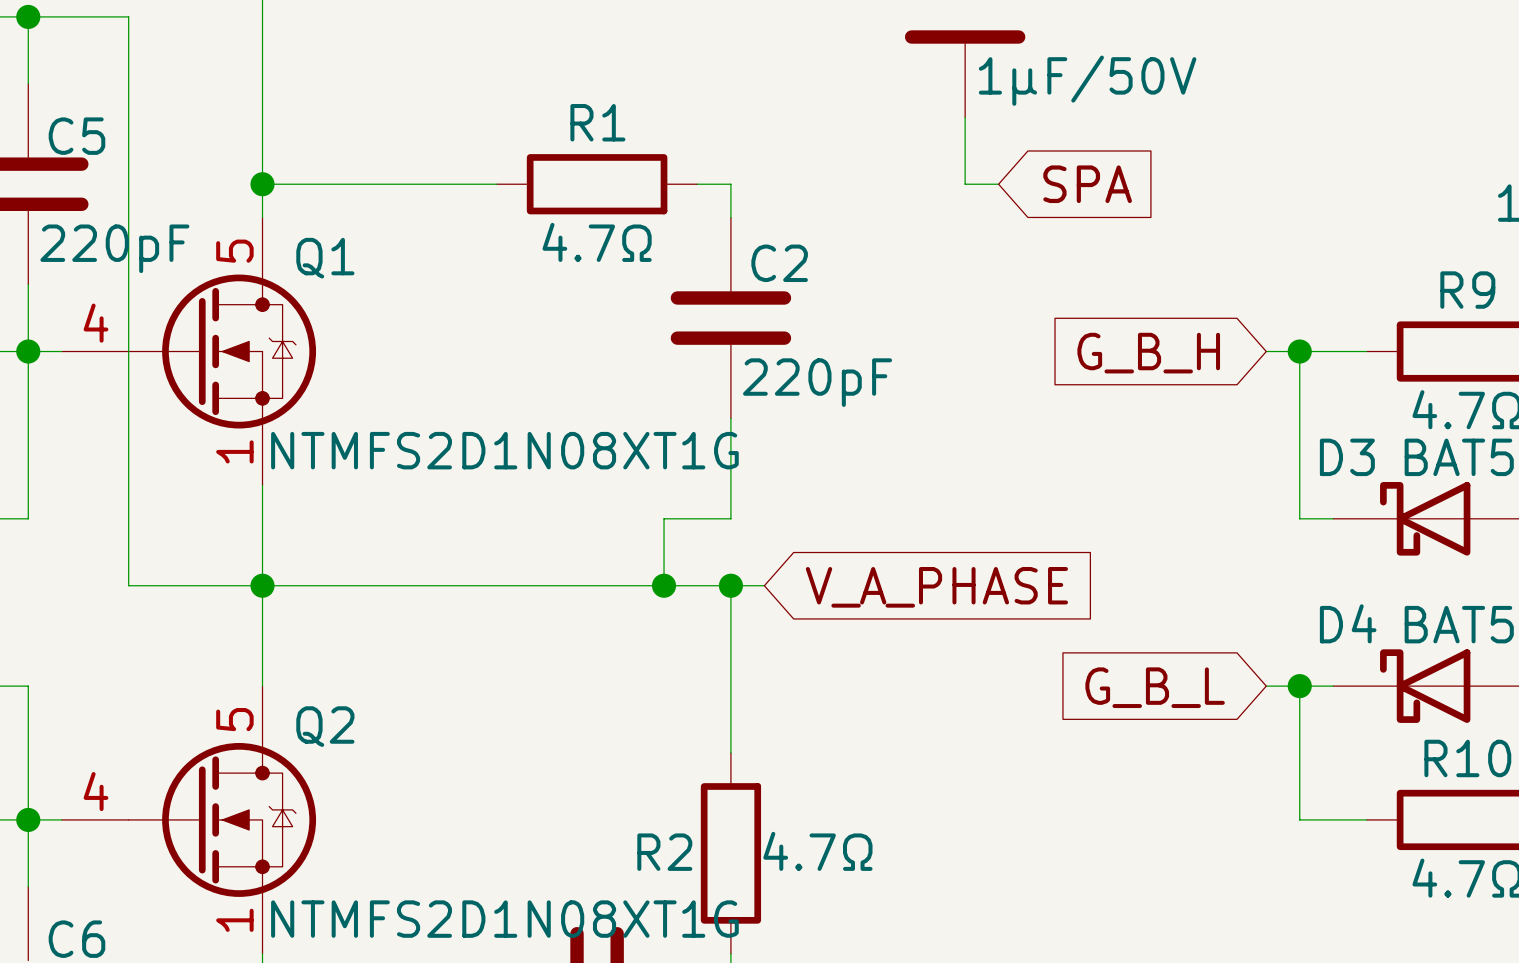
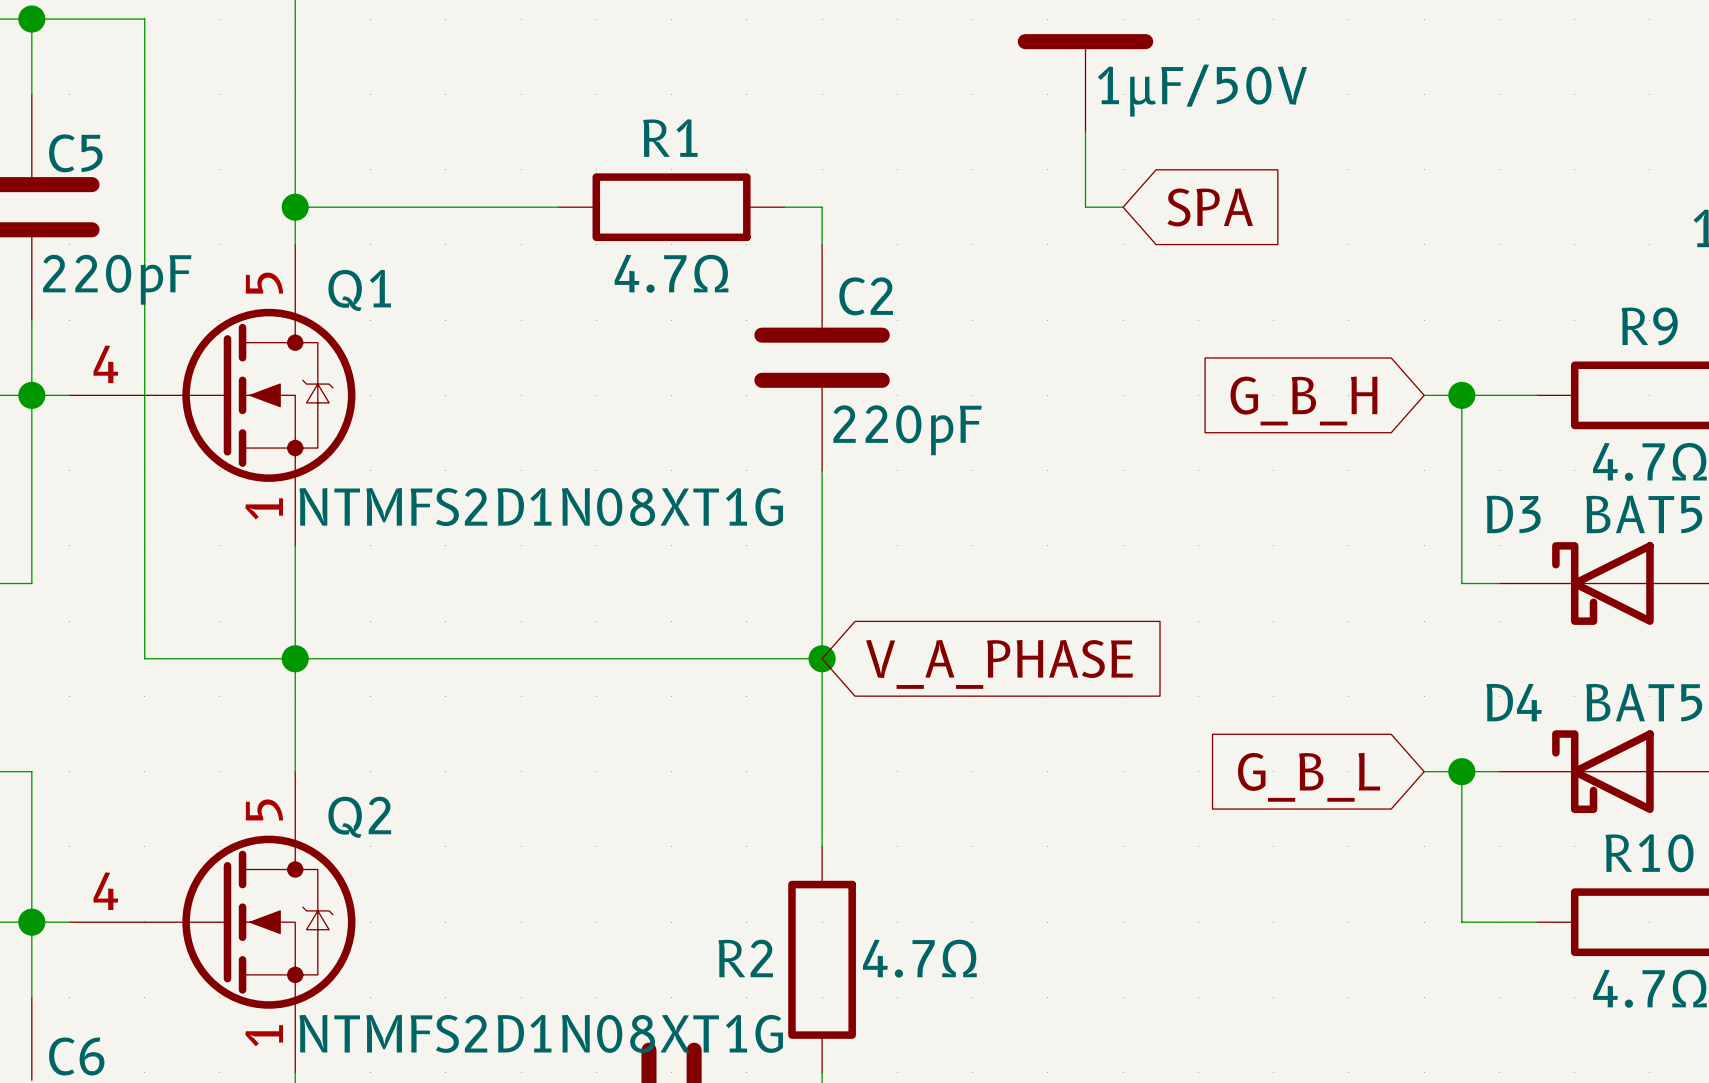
wire: (730, 518) (664, 518) (664, 585) -> (822, 583) (822, 658)
junction: (664, 585) -> none
wire: (730, 585) (764, 585) -> none
global label position: V_A_PHASE (936, 587) -> V_A_PHASE (999, 664)

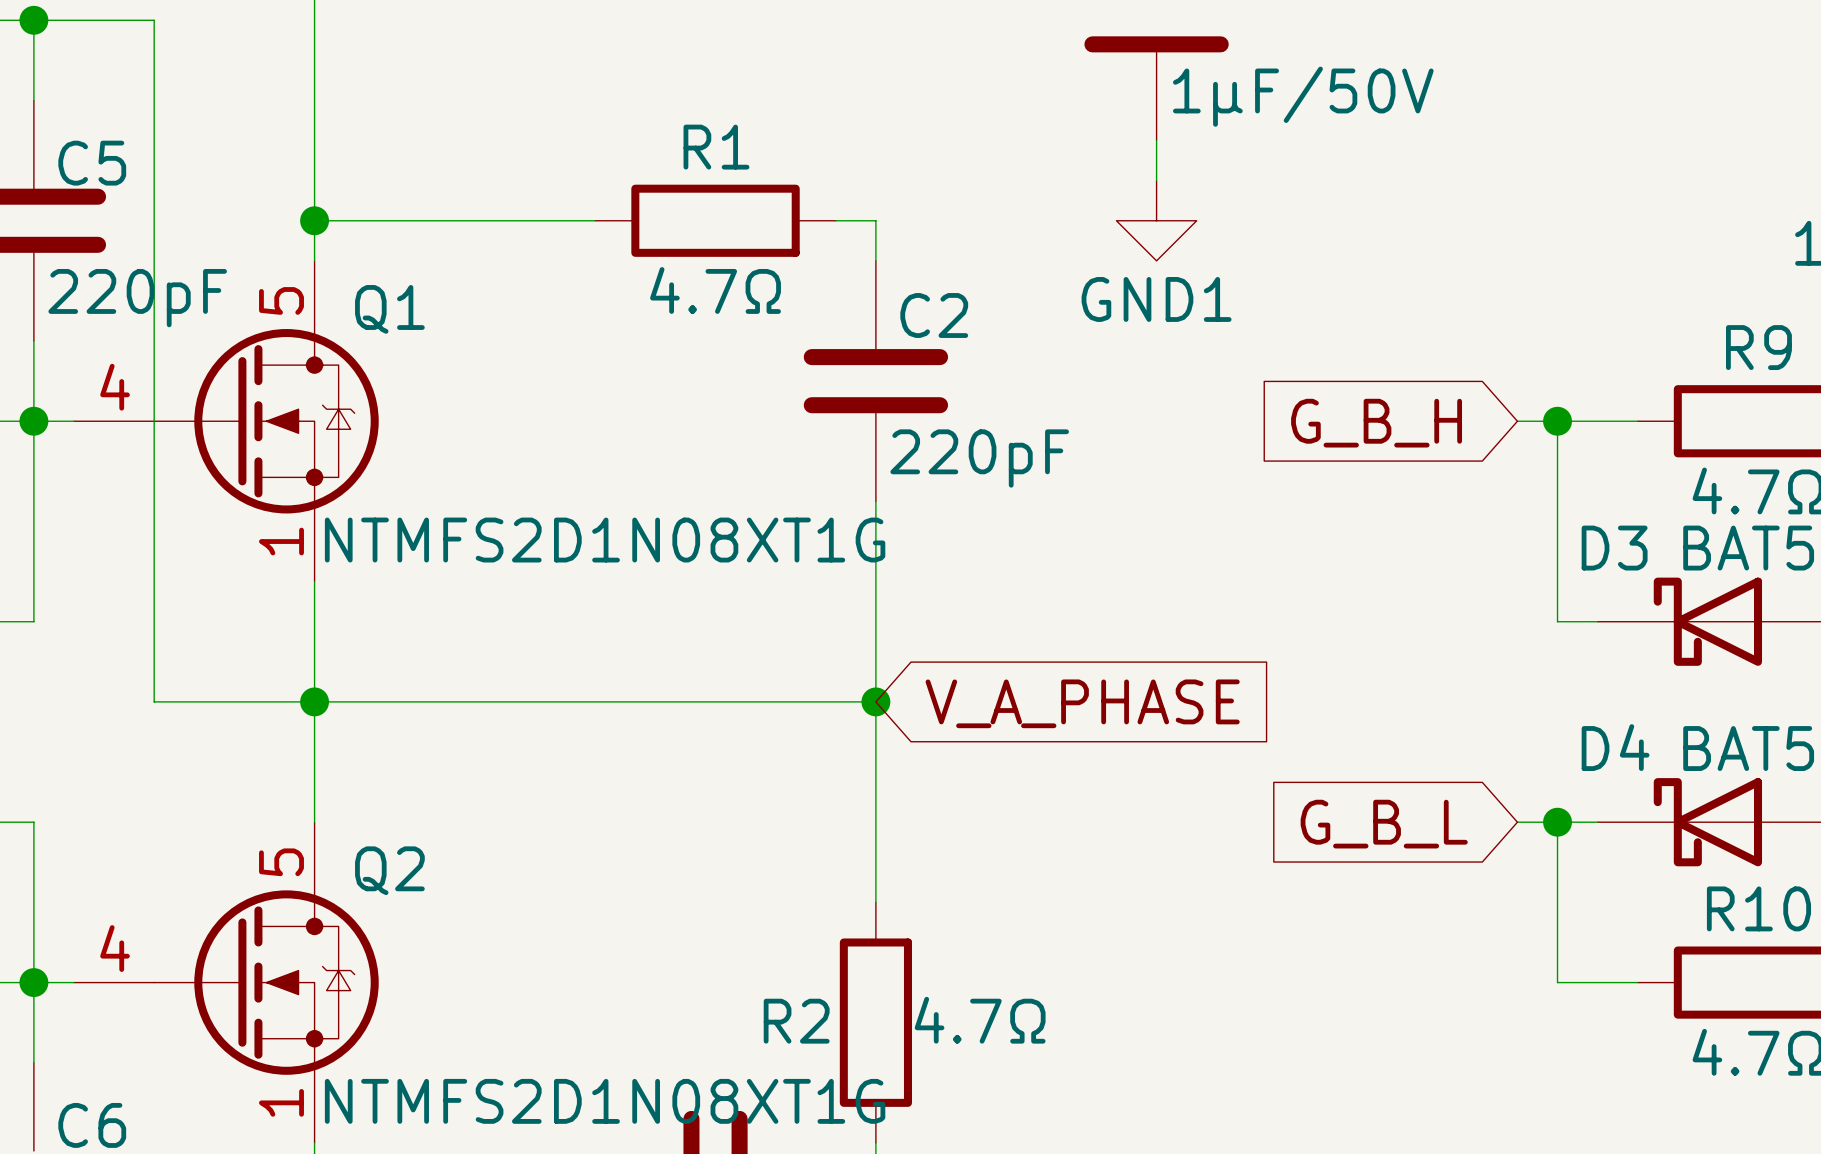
power symbol: none -> GND1 (1156, 220)
global label: SPA (1210, 207) -> none

